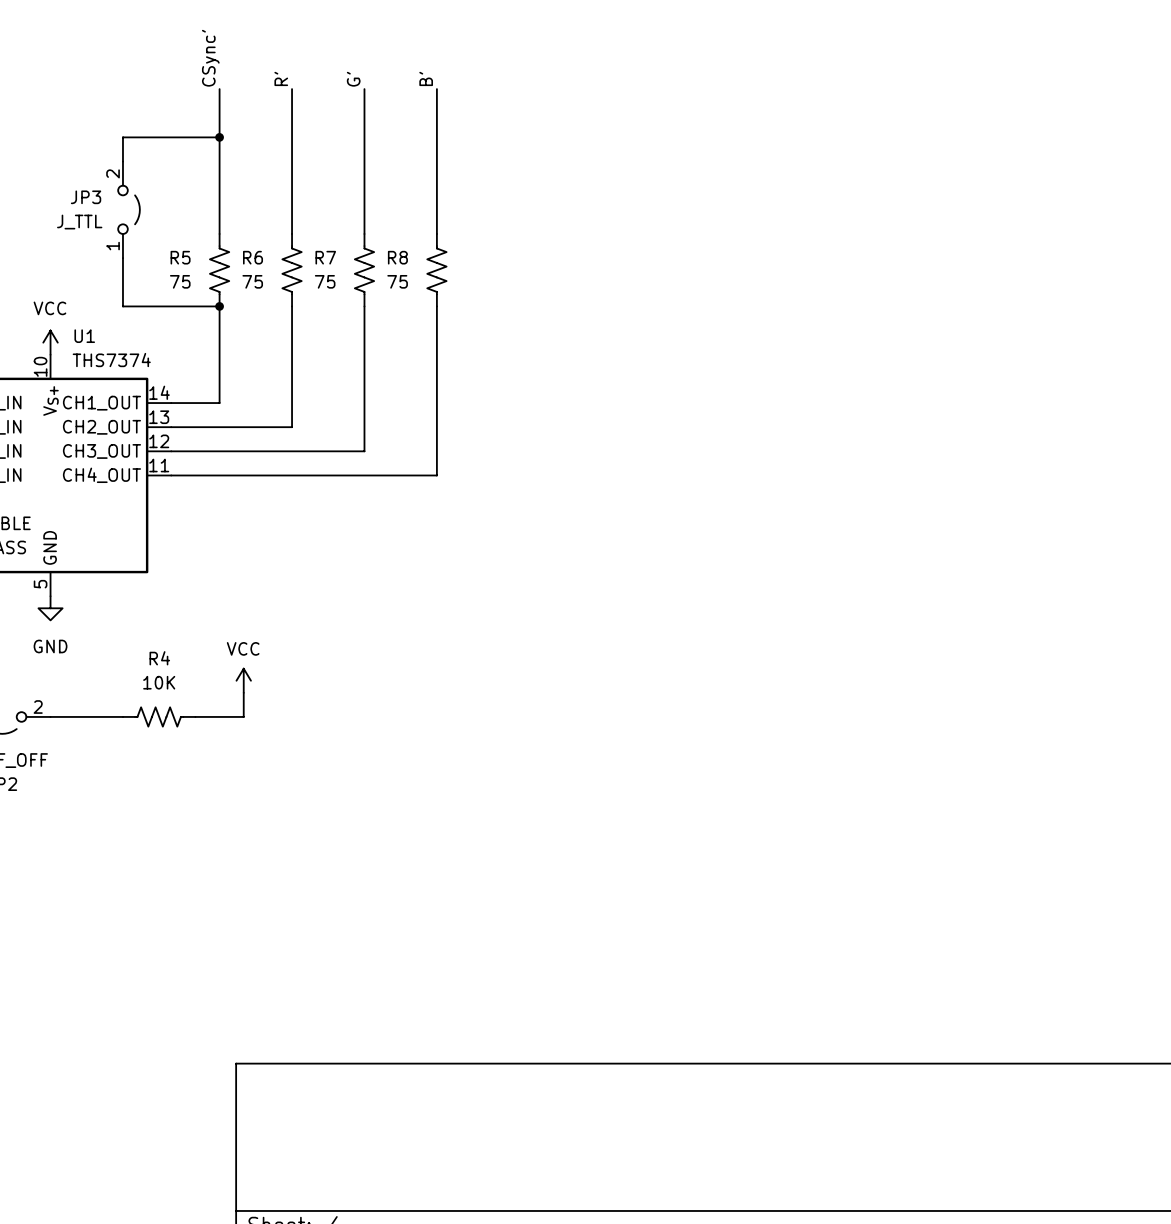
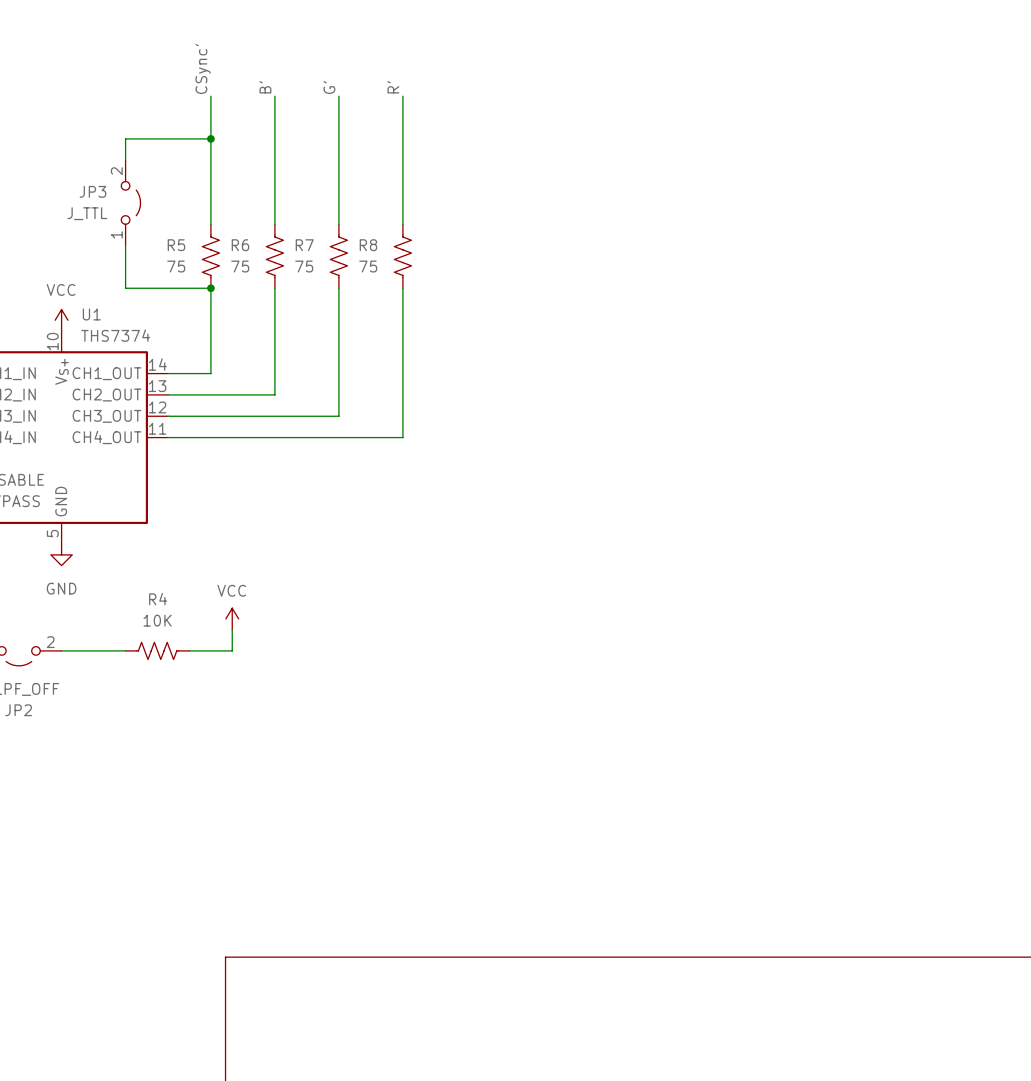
label: R' (281, 78) -> B' (265, 87)
label: B' (426, 78) -> R' (393, 87)

